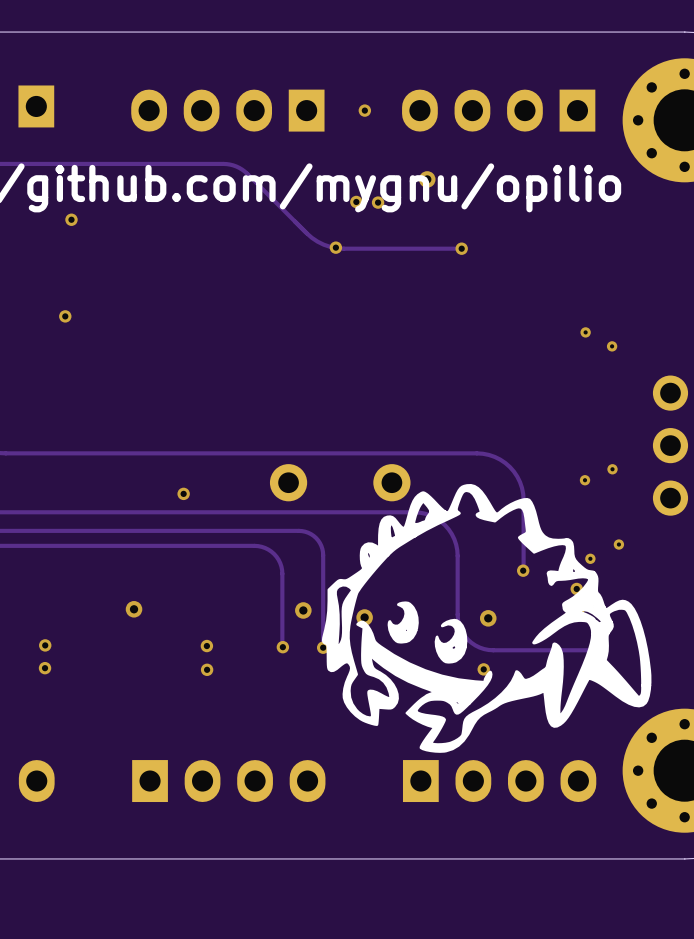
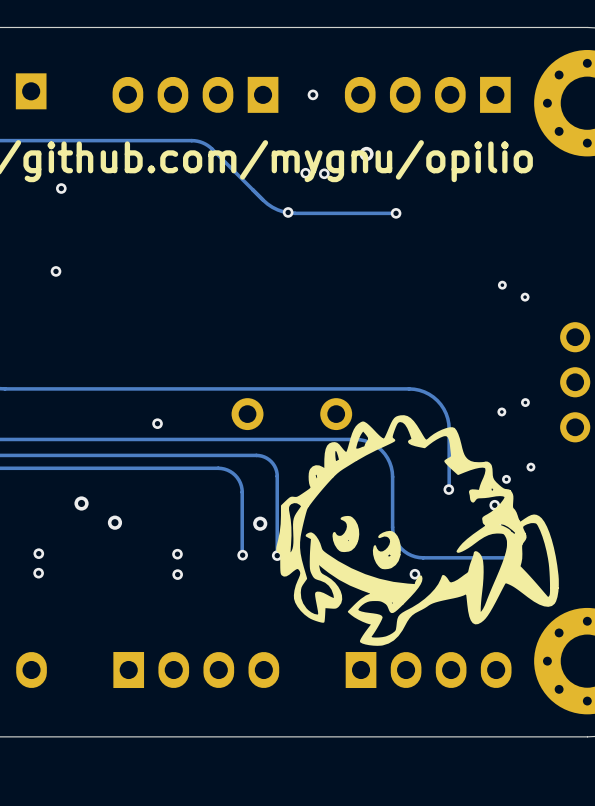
via: none -> (81, 503)
via: (364, 617) -> none
via: (488, 618) -> none

